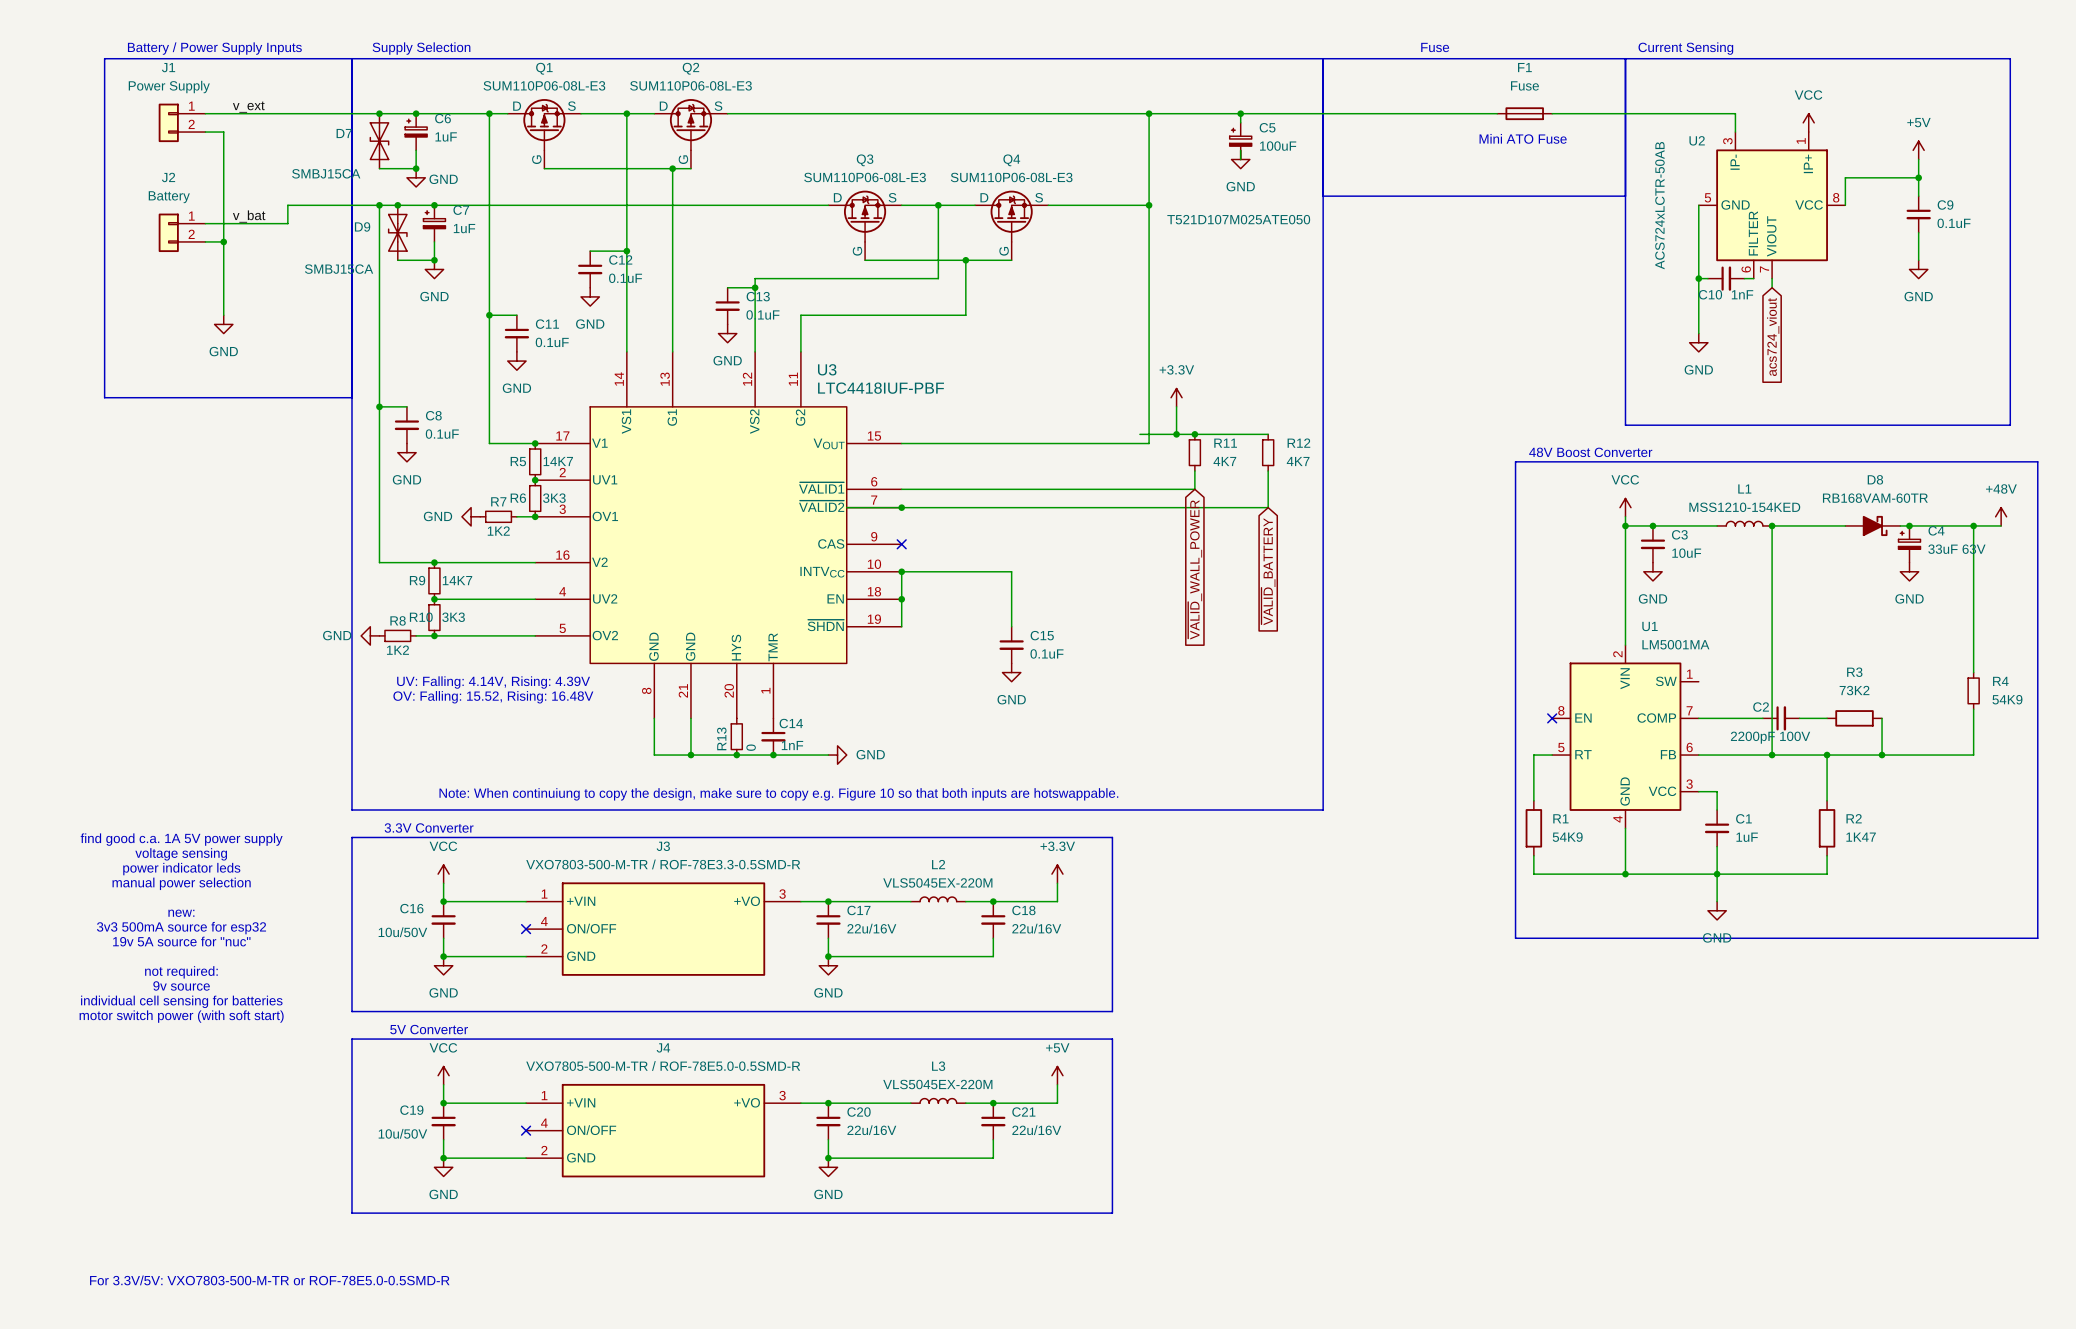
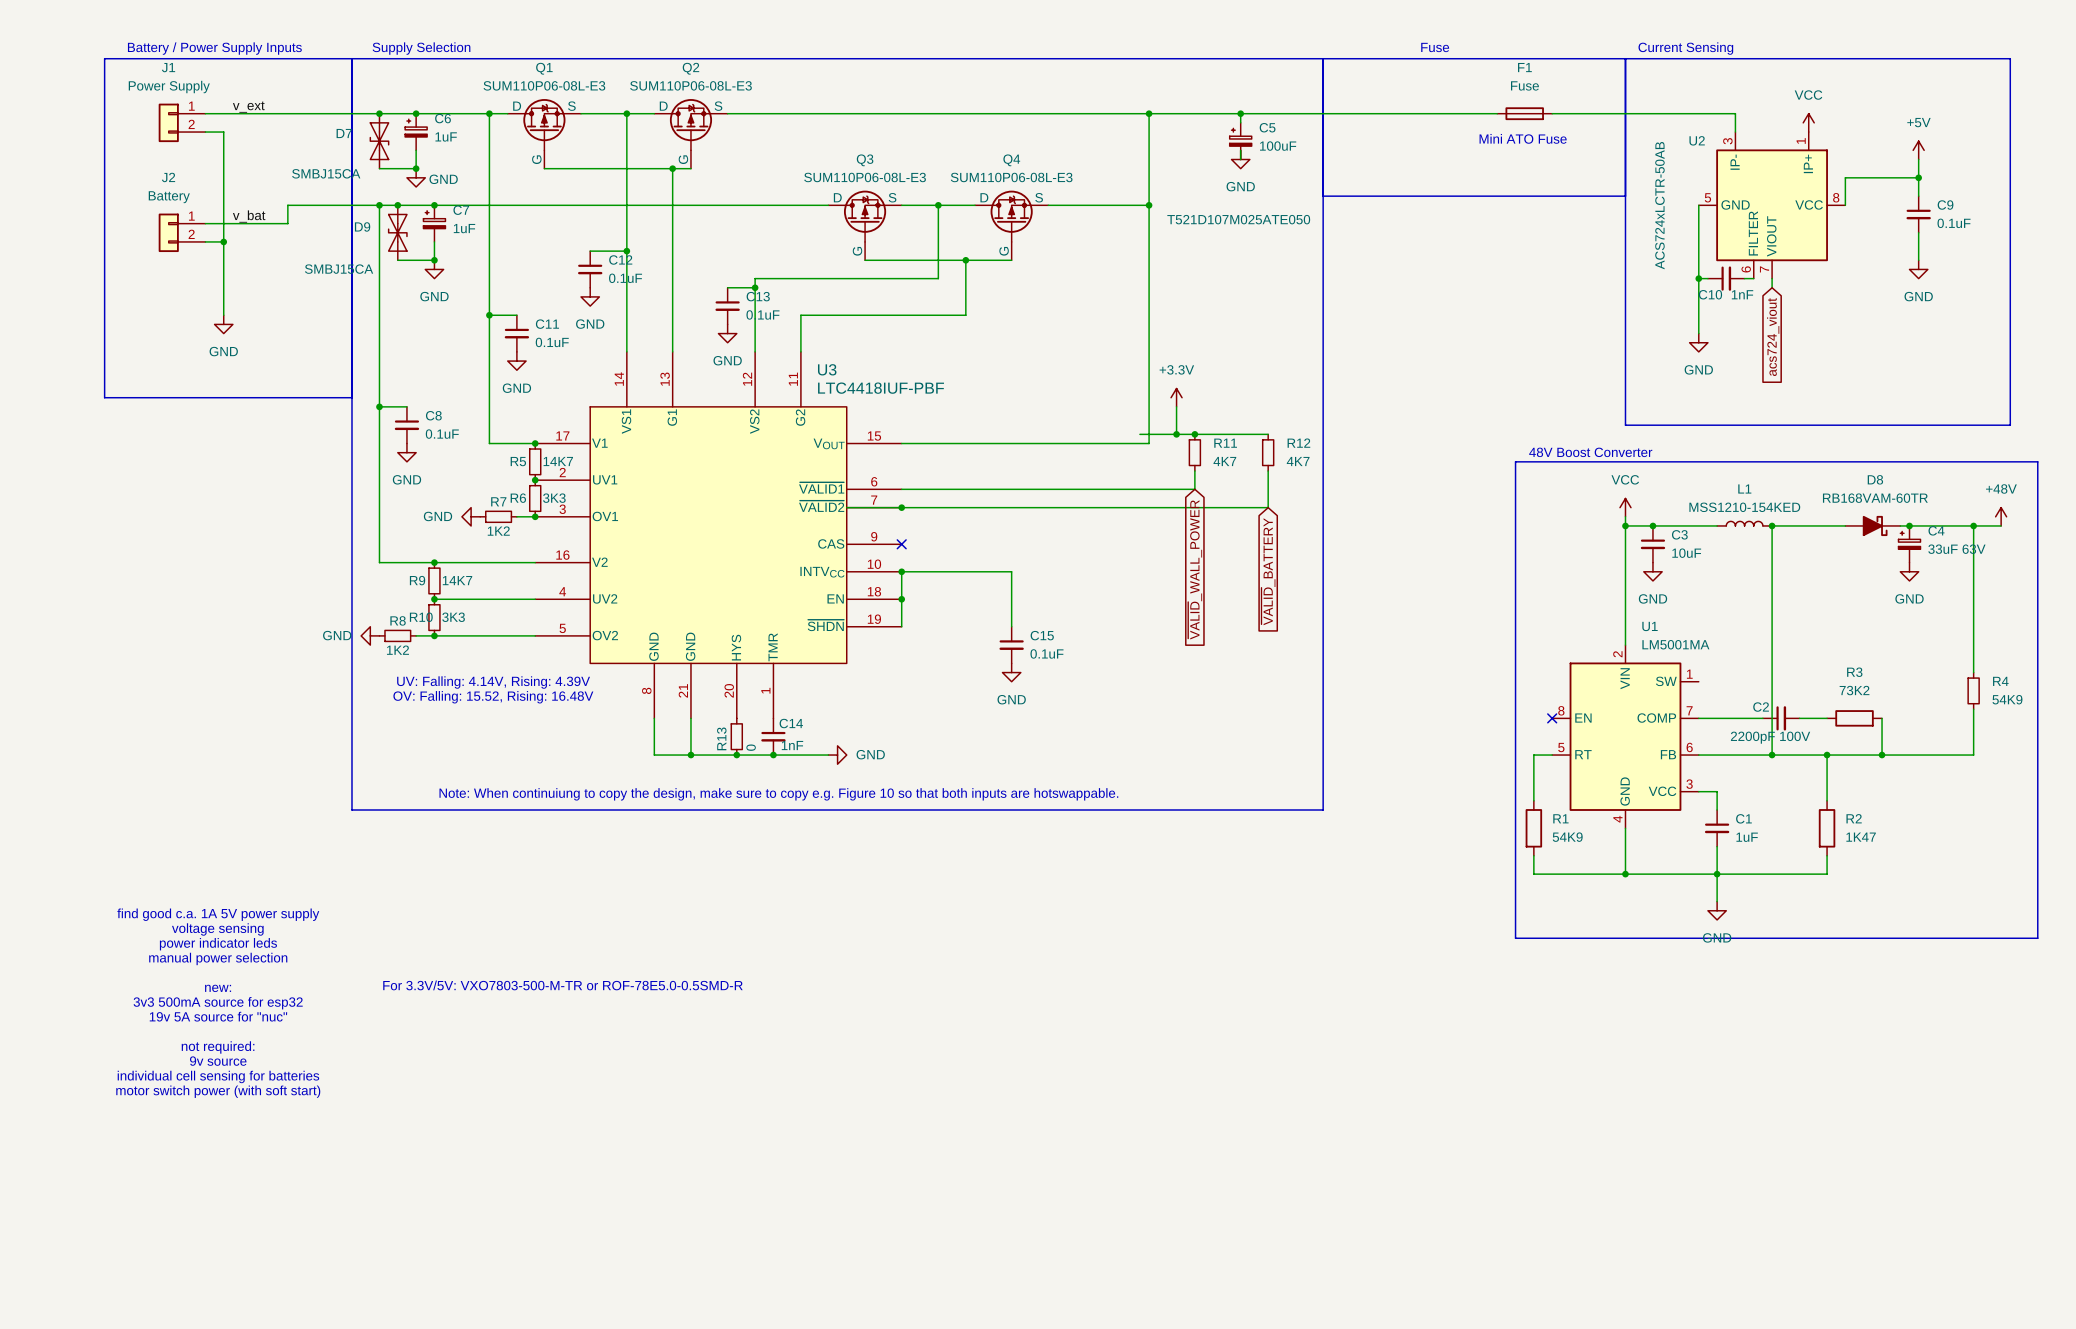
text: 3.3V Converter (429, 828) -> none
line: (351, 837) (351, 1011) (1112, 1011) (1112, 837) (351, 837) -> none
text position: find good c.a. 1A 5V power supply (181, 839) -> find good c.a. 1A 5V power supply (218, 914)
text position: voltage sensing (181, 854) -> voltage sensing (217, 929)
text position: power indicator leds (181, 869) -> power indicator leds (218, 944)
power symbol: VCC (443, 874) -> none
power symbol: +3.3V (1057, 874) -> none
text position: manual power selection (181, 883) -> manual power selection (218, 958)
wire: (443, 883) (443, 901) (526, 901) -> none
wire: (1057, 883) (1057, 901) (965, 901) -> none
L2: VLS5045EX-220M (938, 899) -> none
junction: (443, 901) -> none
wire: (800, 901) (910, 901) -> none
junction: (828, 901) -> none
junction: (993, 901) -> none
text position: new: (181, 913) -> new: (218, 988)
C16: 10u/50V (443, 919) -> none
C17: 22u/16V (828, 919) -> none
C18: 22u/16V (993, 919) -> none
text position: 3v3 500mA source for esp32 (181, 928) -> 3v3 500mA source for esp32 (218, 1003)
no-connect mark: (526, 929) -> none
J3: VXO7803-500-M-TR / ROF-78E3.3-0.5SMD-R (663, 929) -> none
wire: (443, 938) (443, 956) (526, 956) -> none
wire: (828, 938) (828, 956) (993, 956) (993, 938) -> none
text position: 19v 5A source for "nuc" (181, 941) -> 19v 5A source for "nuc" (218, 1016)
junction: (443, 956) -> none
junction: (828, 956) -> none
power symbol: GND (443, 965) -> none
power symbol: GND (828, 965) -> none
text position: not required: (181, 972) -> not required: (218, 1047)
text position: 9v source (181, 985) -> 9v source (218, 1061)
text: none -> For 3.3V/5V: VXO7803-500-M-TR or ROF-78E5.0-0.5SMD-R (562, 985)
text position: individual cell sensing for batteries (181, 1001) -> individual cell sensing for batteries (218, 1076)
text position: motor switch power (with soft start) (181, 1016) -> motor switch power (with soft start) (218, 1091)
text: 5V Converter (429, 1029) -> none
line: (351, 1039) (1112, 1039) (1112, 1213) (351, 1213) (351, 1039) -> none
power symbol: VCC (443, 1075) -> none
power symbol: +5V (1057, 1075) -> none
wire: (443, 1084) (443, 1103) (526, 1103) -> none
wire: (1057, 1084) (1057, 1103) (965, 1103) -> none
L3: VLS5045EX-220M (938, 1100) -> none
junction: (443, 1103) -> none
wire: (800, 1103) (910, 1103) -> none
junction: (828, 1103) -> none
junction: (993, 1103) -> none
C19: 10u/50V (443, 1121) -> none
C20: 22u/16V (828, 1121) -> none
C21: 22u/16V (993, 1121) -> none
no-connect mark: (526, 1130) -> none
J4: VXO7805-500-M-TR / ROF-78E5.0-0.5SMD-R (663, 1130) -> none
wire: (443, 1139) (443, 1158) (526, 1158) -> none
wire: (828, 1139) (828, 1158) (993, 1158) (993, 1139) -> none
junction: (443, 1158) -> none
junction: (828, 1158) -> none
power symbol: GND (443, 1167) -> none
power symbol: GND (828, 1167) -> none
text: For 3.3V/5V: VXO7803-500-M-TR or ROF-78E5.0-0.5SMD-R (269, 1280) -> none

